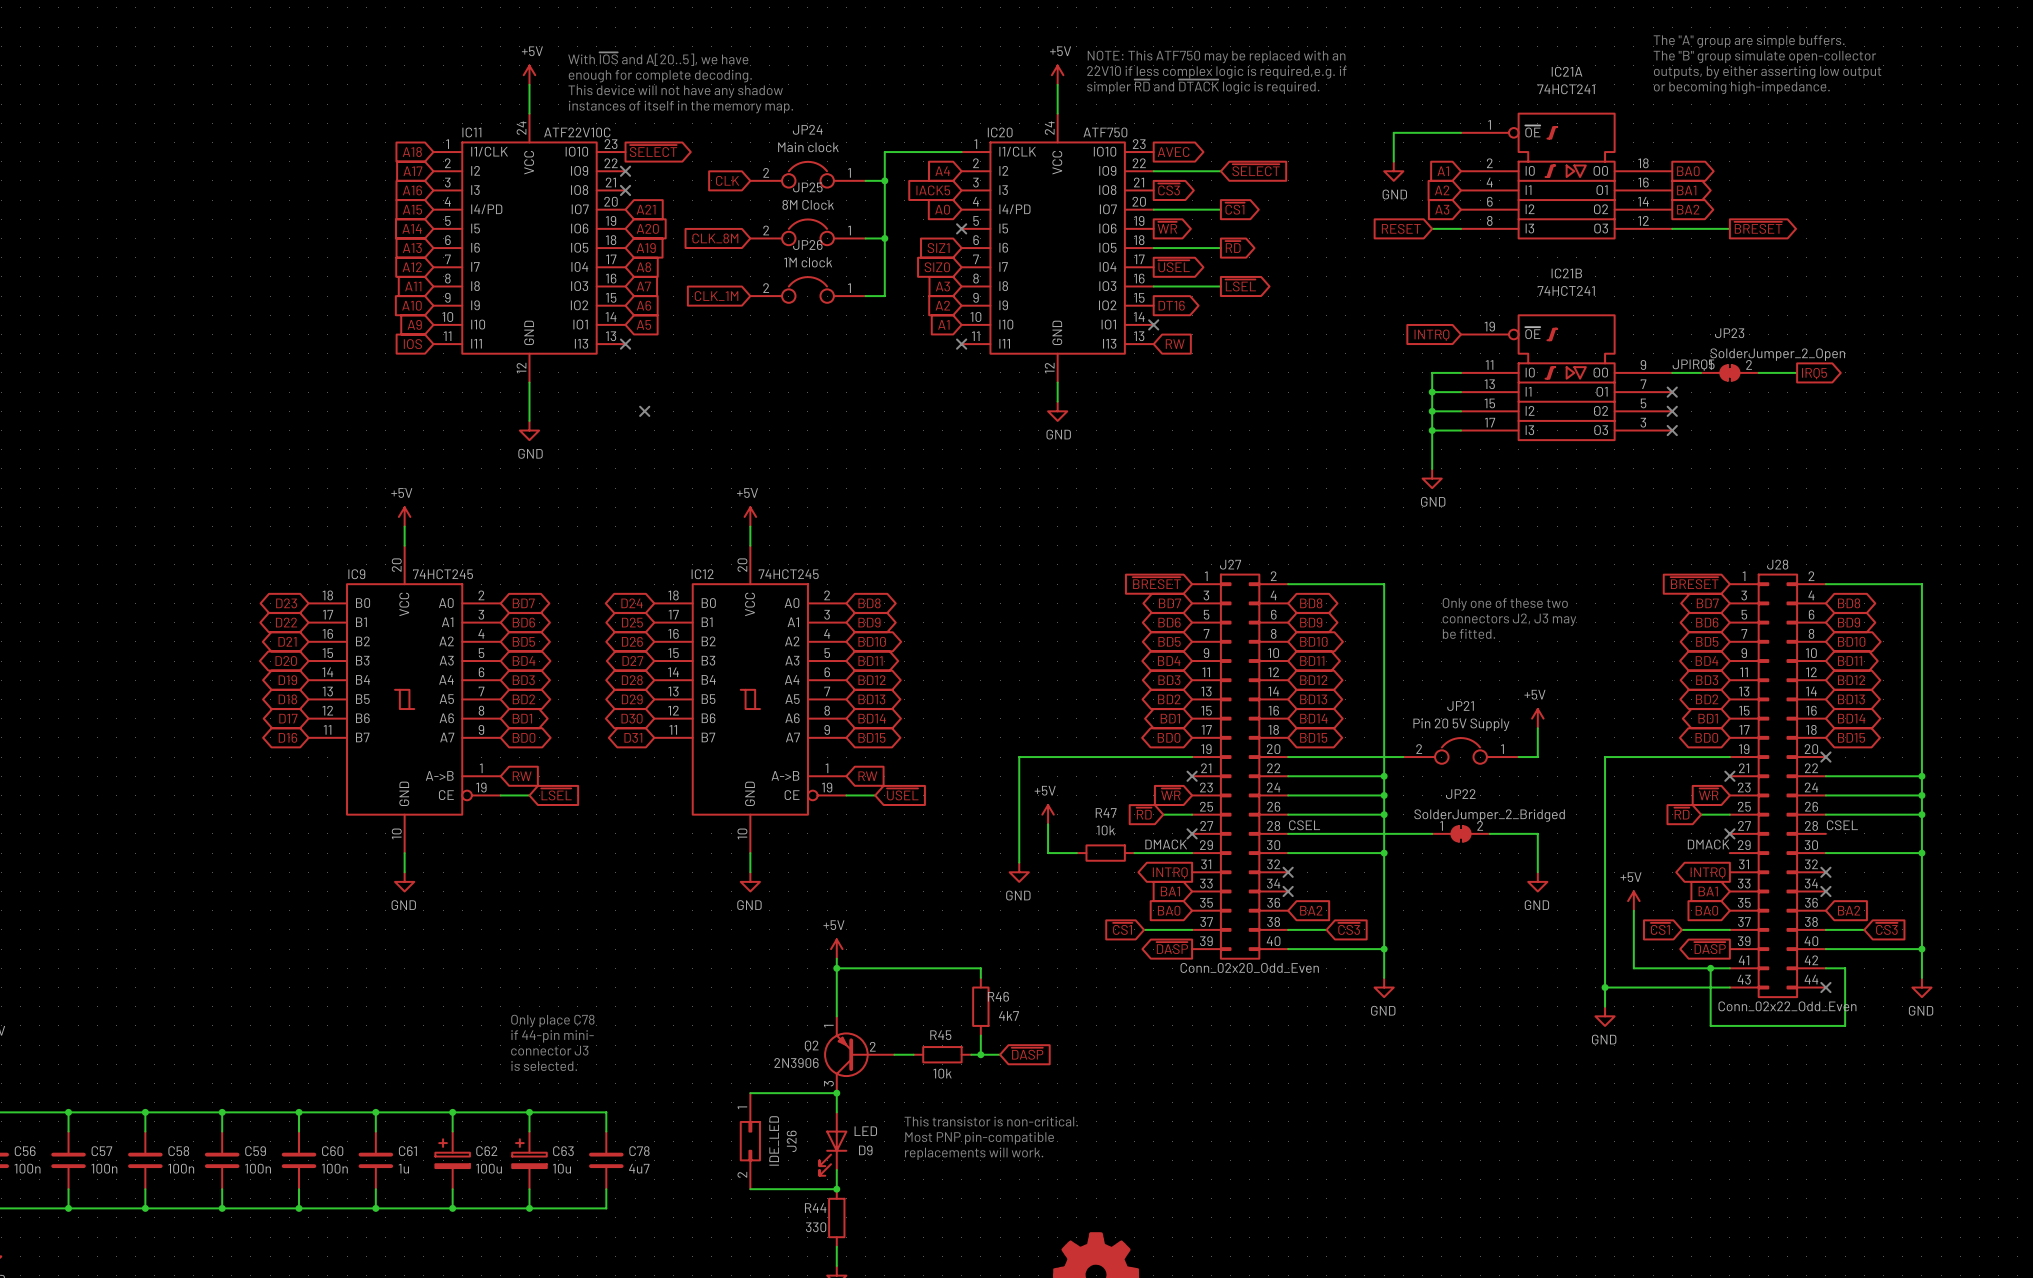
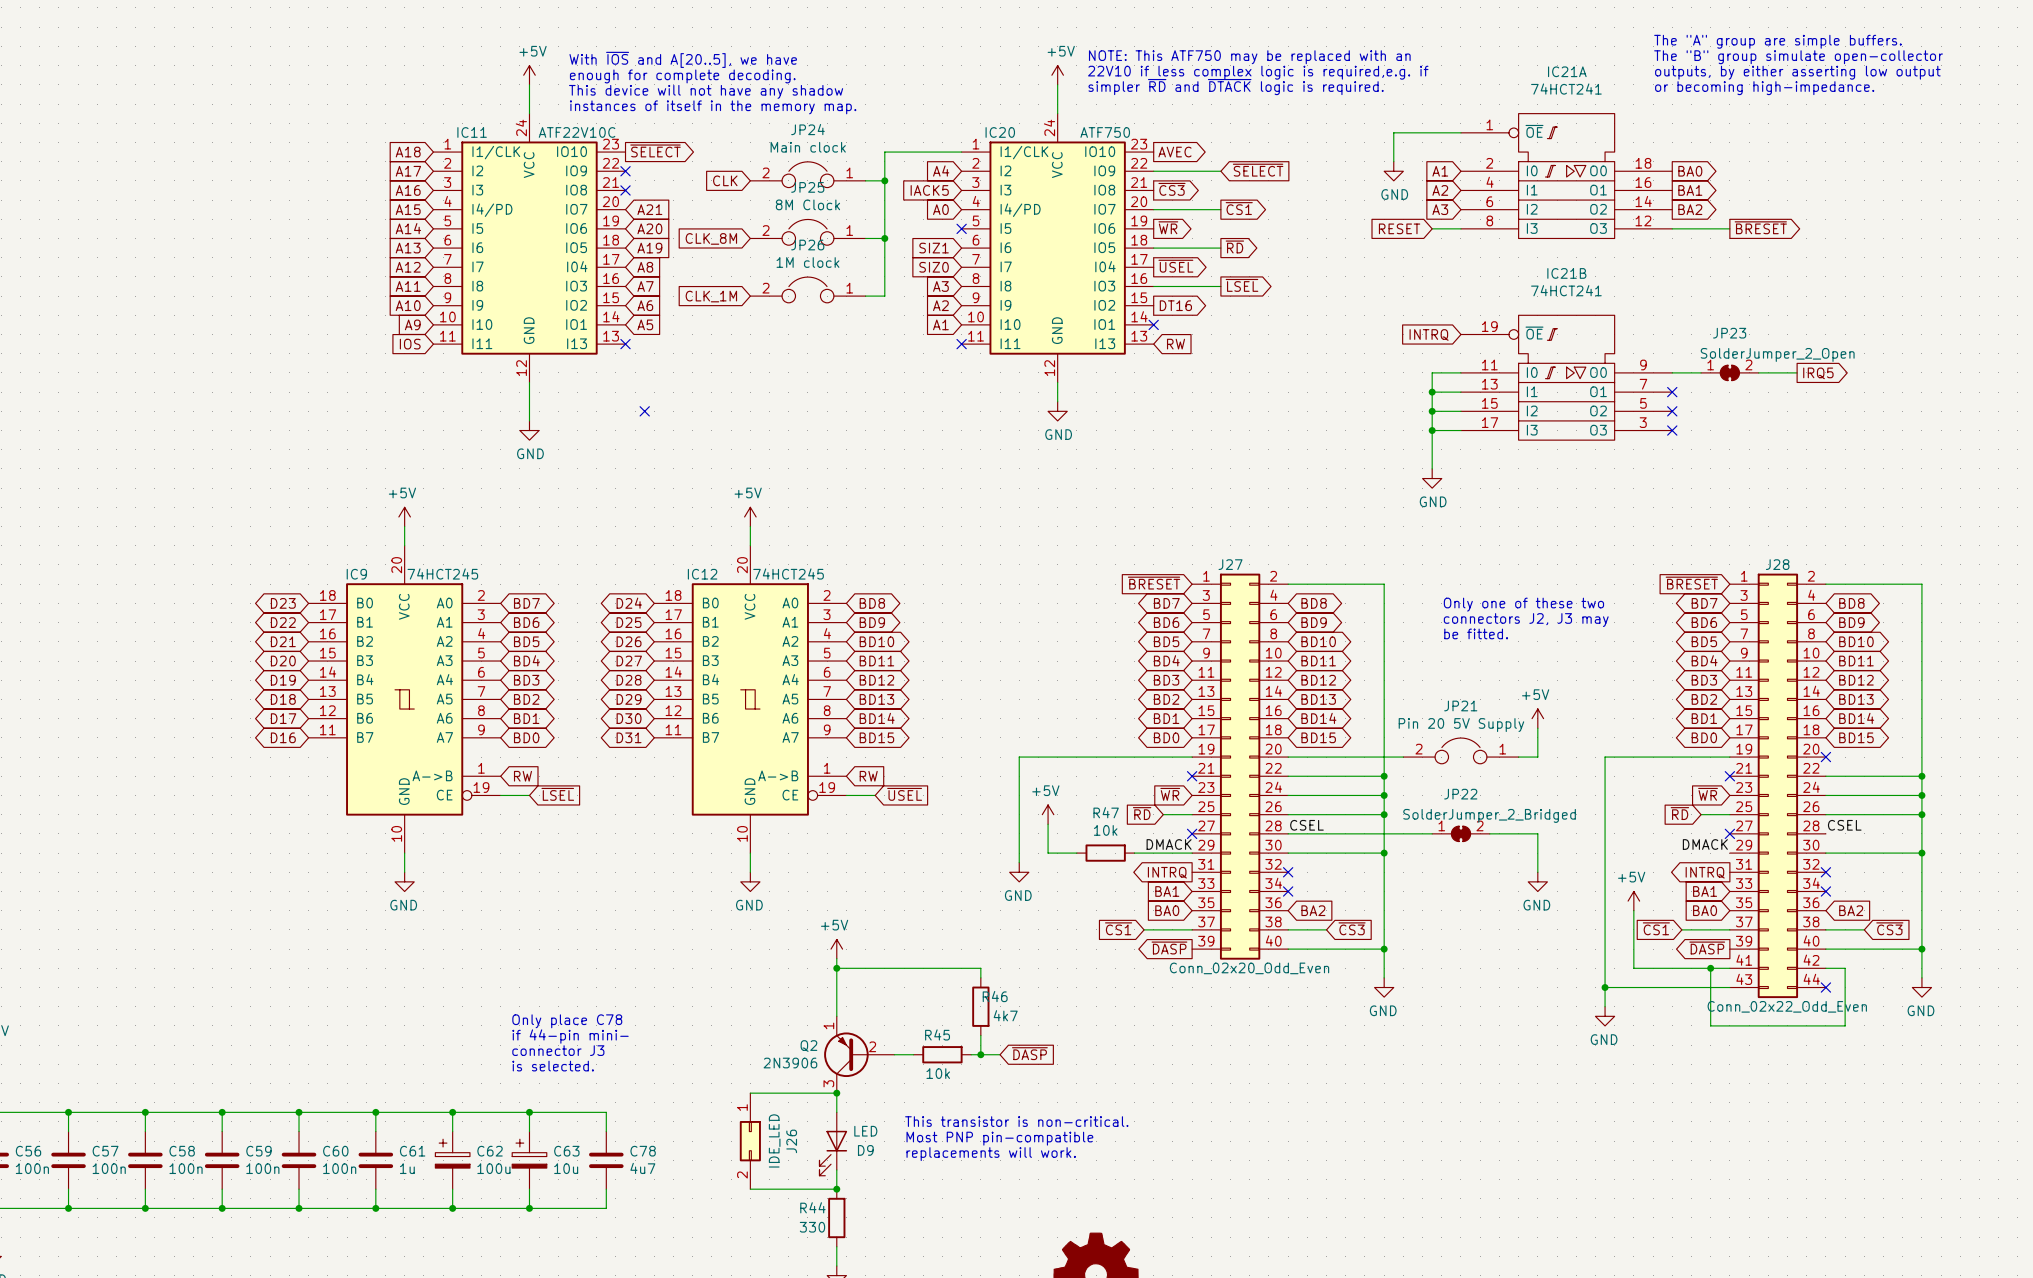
label: JPIRQ5 (1693, 365) -> none

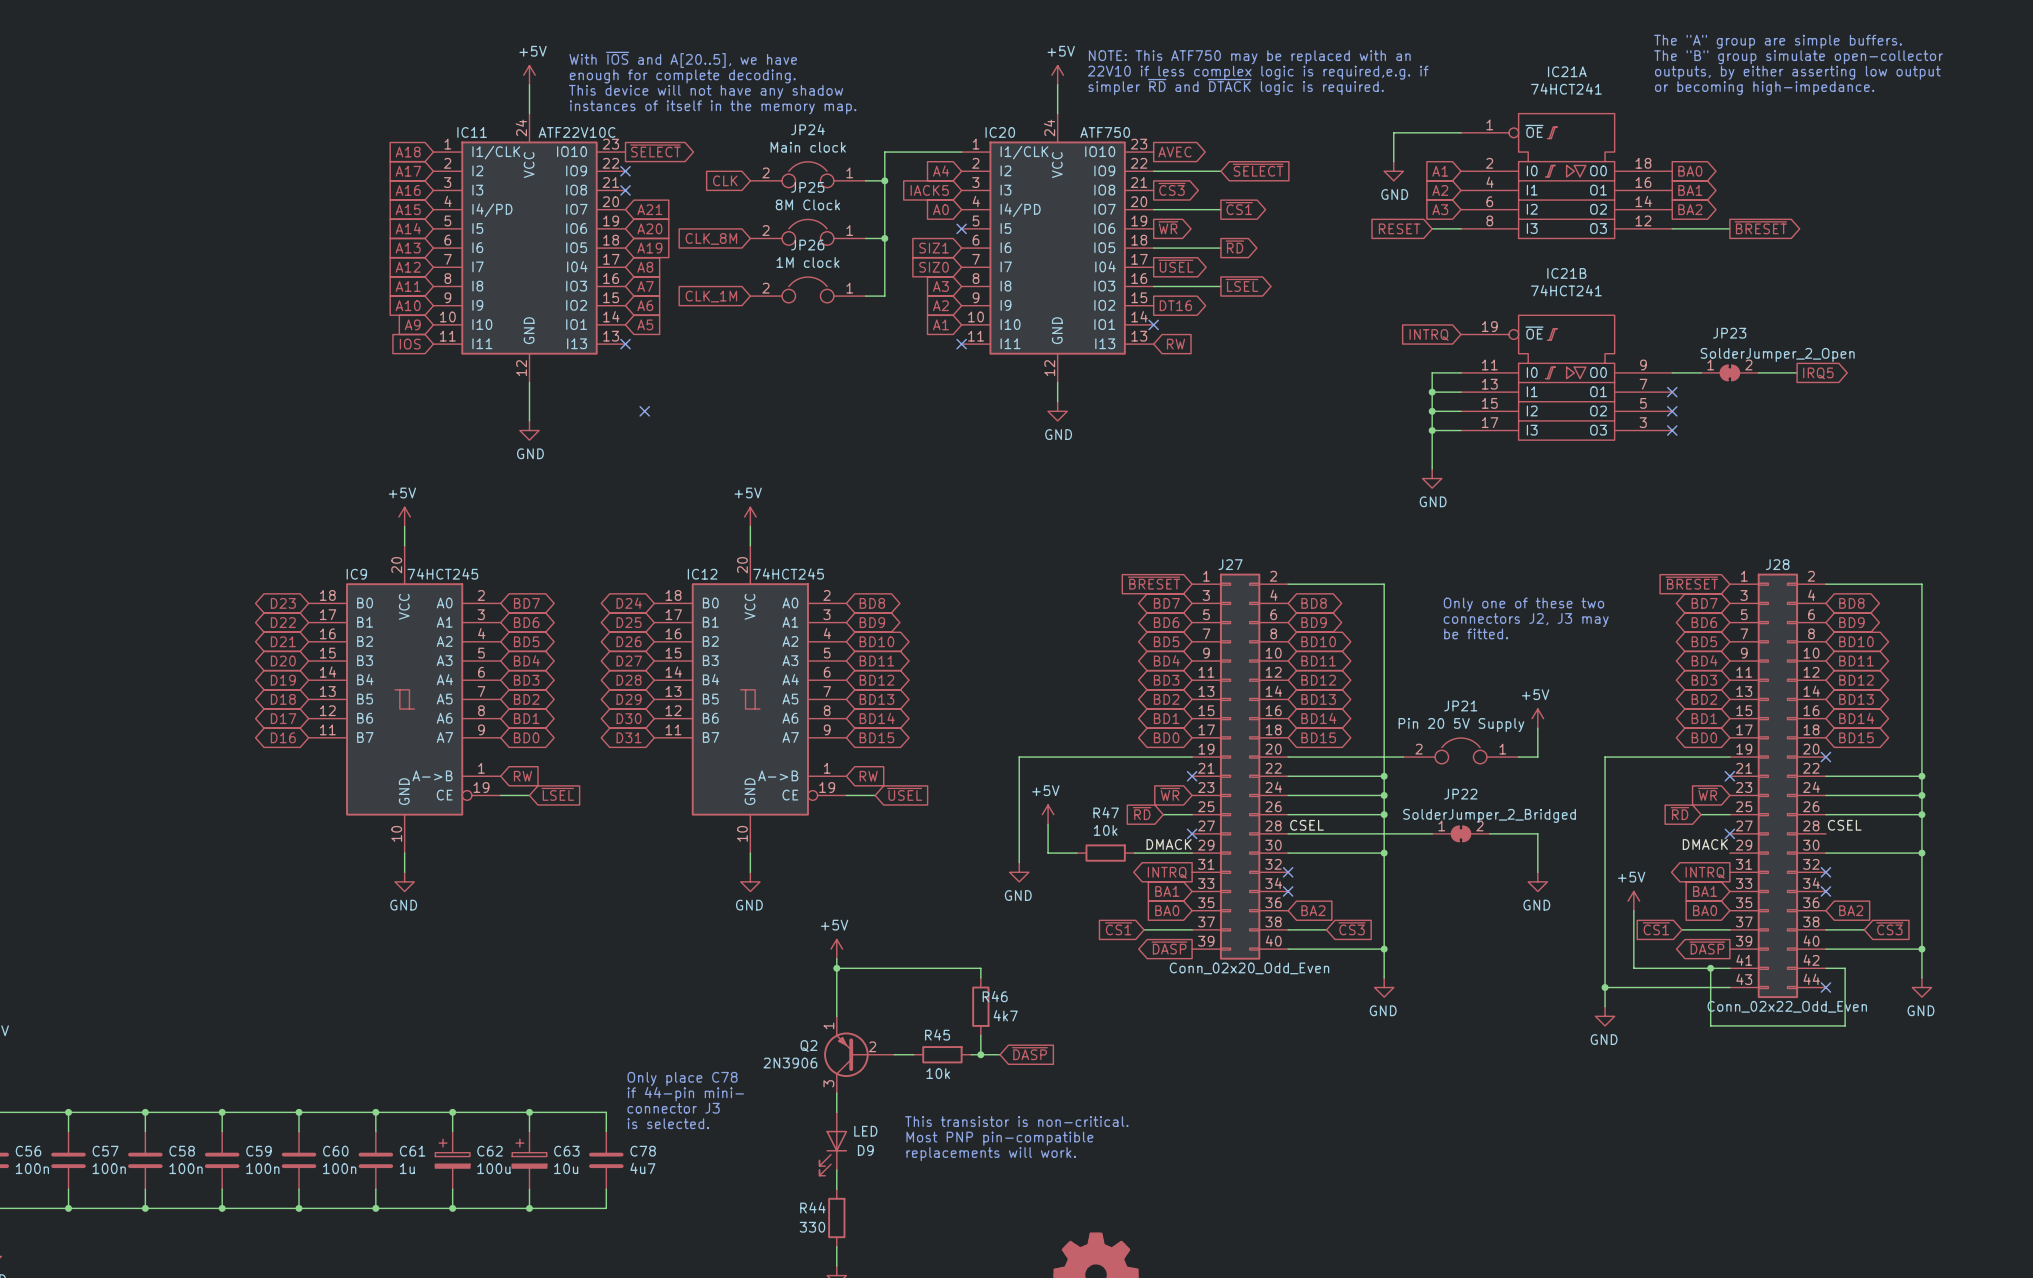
text position: Only place C78 (567, 1021) -> Only place C78 (682, 1078)
text position: if 44-pin mini- (570, 1036) -> if 44-pin mini- (685, 1094)
text position: connector J3 (558, 1050) -> connector J3 (673, 1108)
text position: is selected. (553, 1066) -> is selected. (668, 1123)
wire: (750, 1093) (836, 1093) -> none
junction: (836, 1093) -> none
J26: IDE_LED (750, 1141) -> none
wire: (750, 1189) (836, 1189) -> none
junction: (836, 1189) -> none

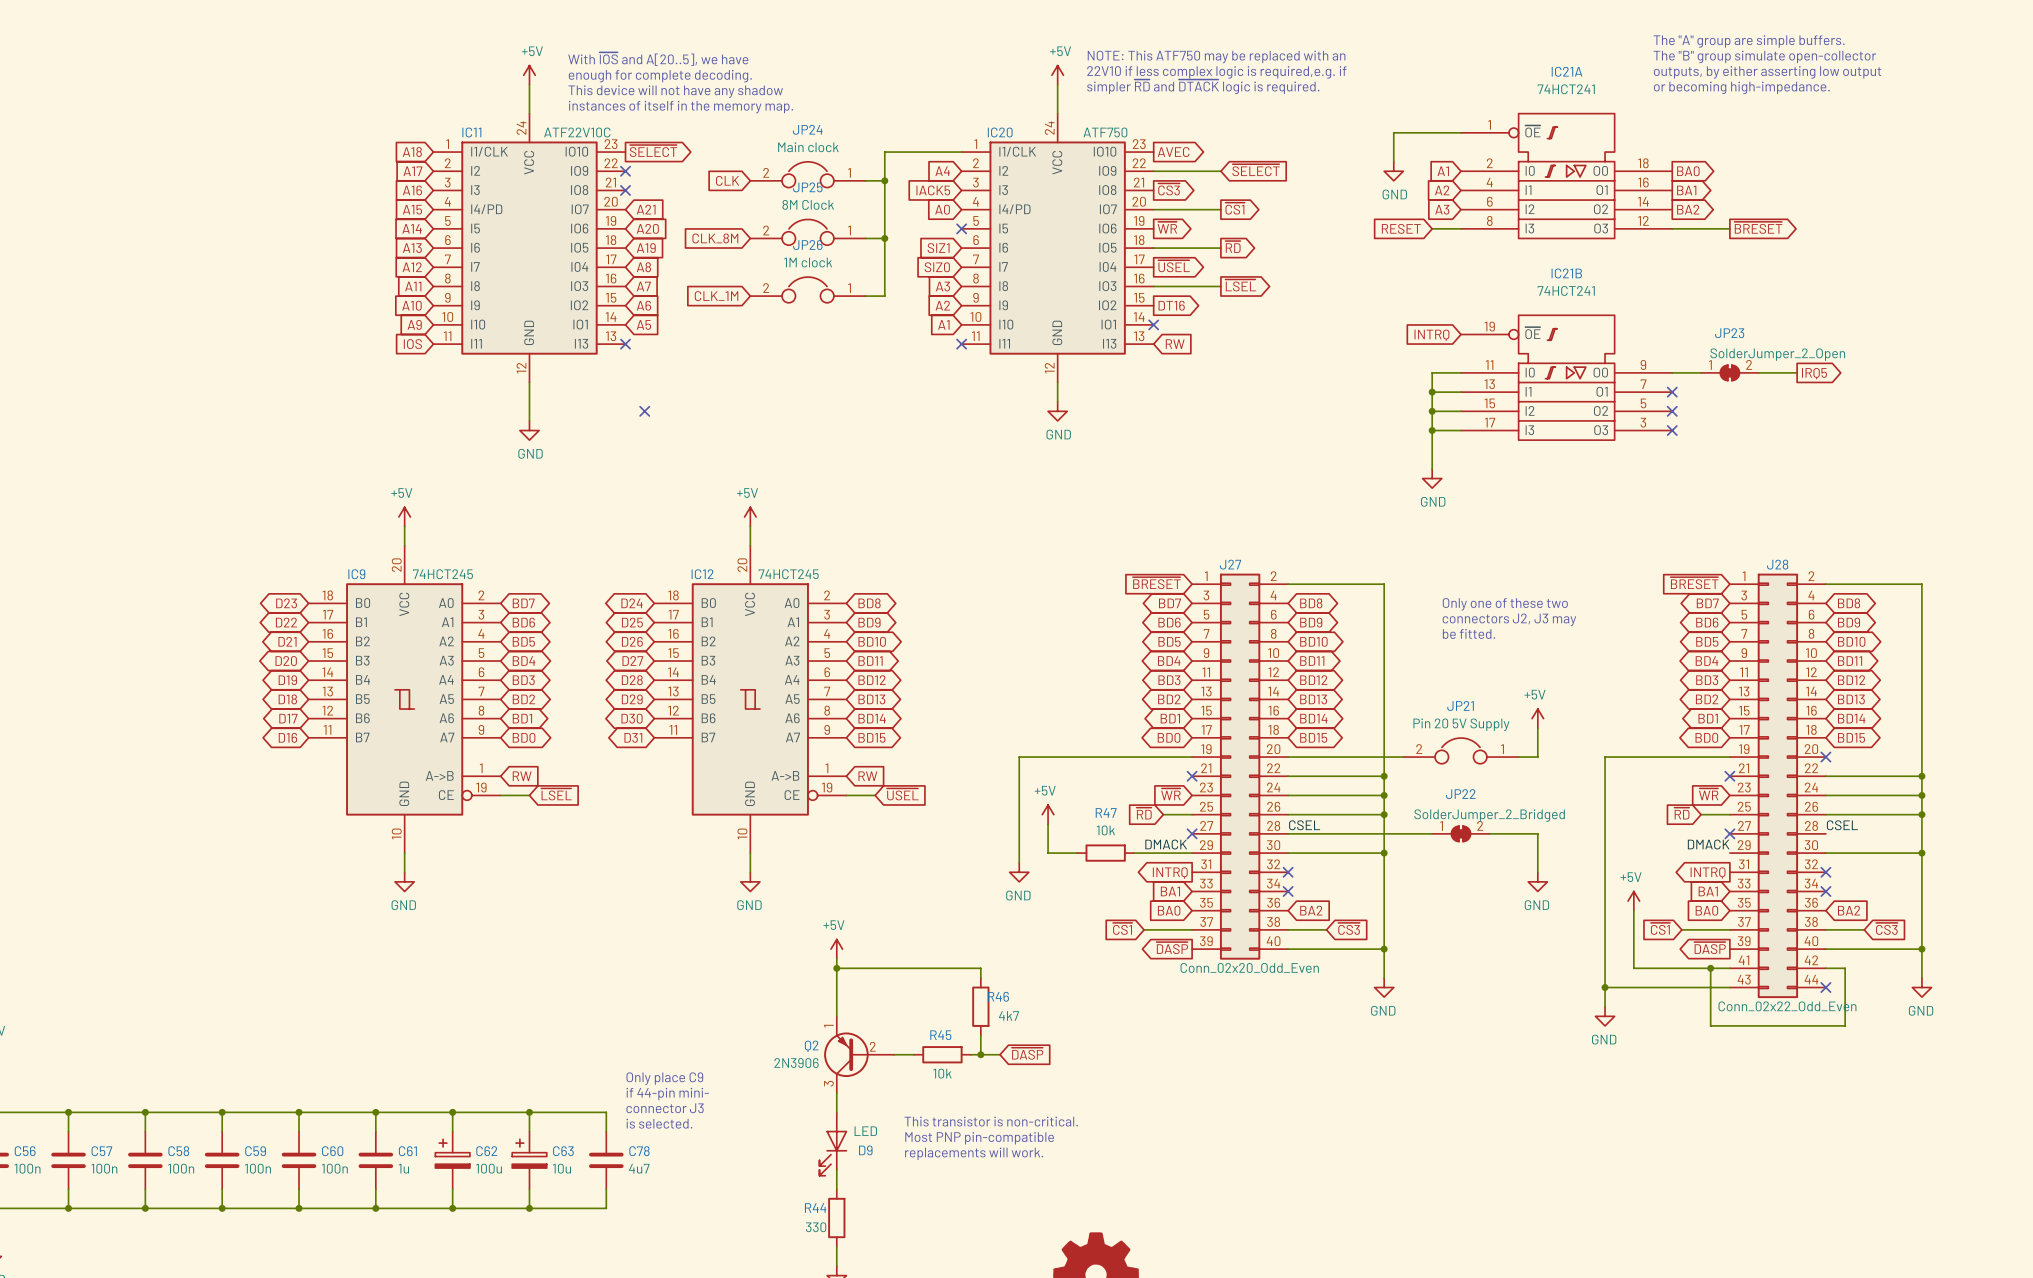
text: Only place C78 (682, 1078) -> Only place C9 (664, 1078)

